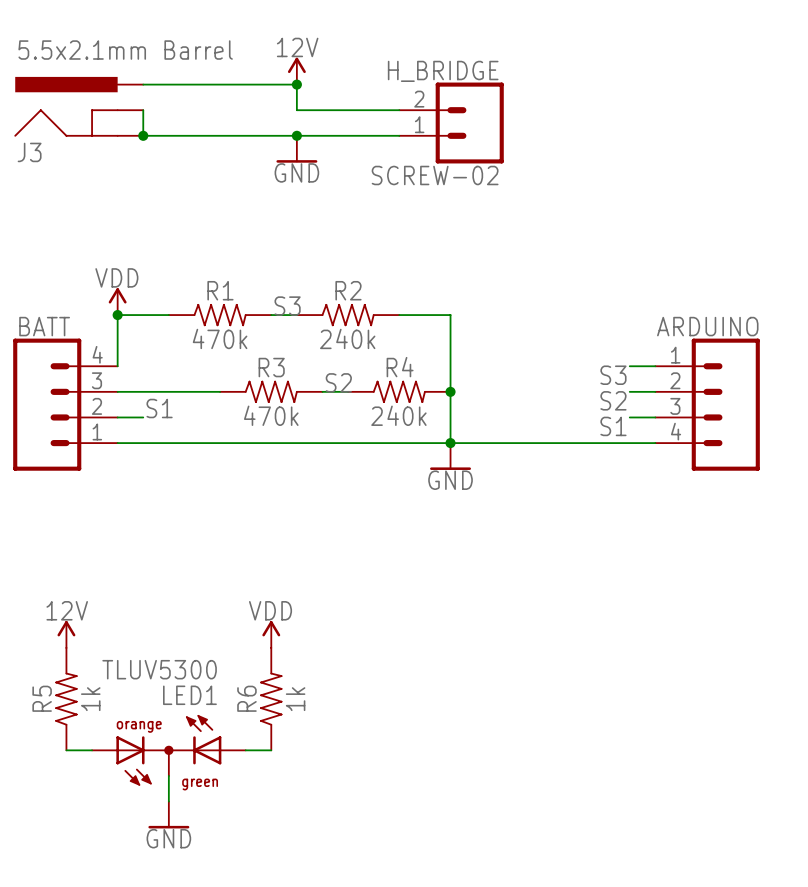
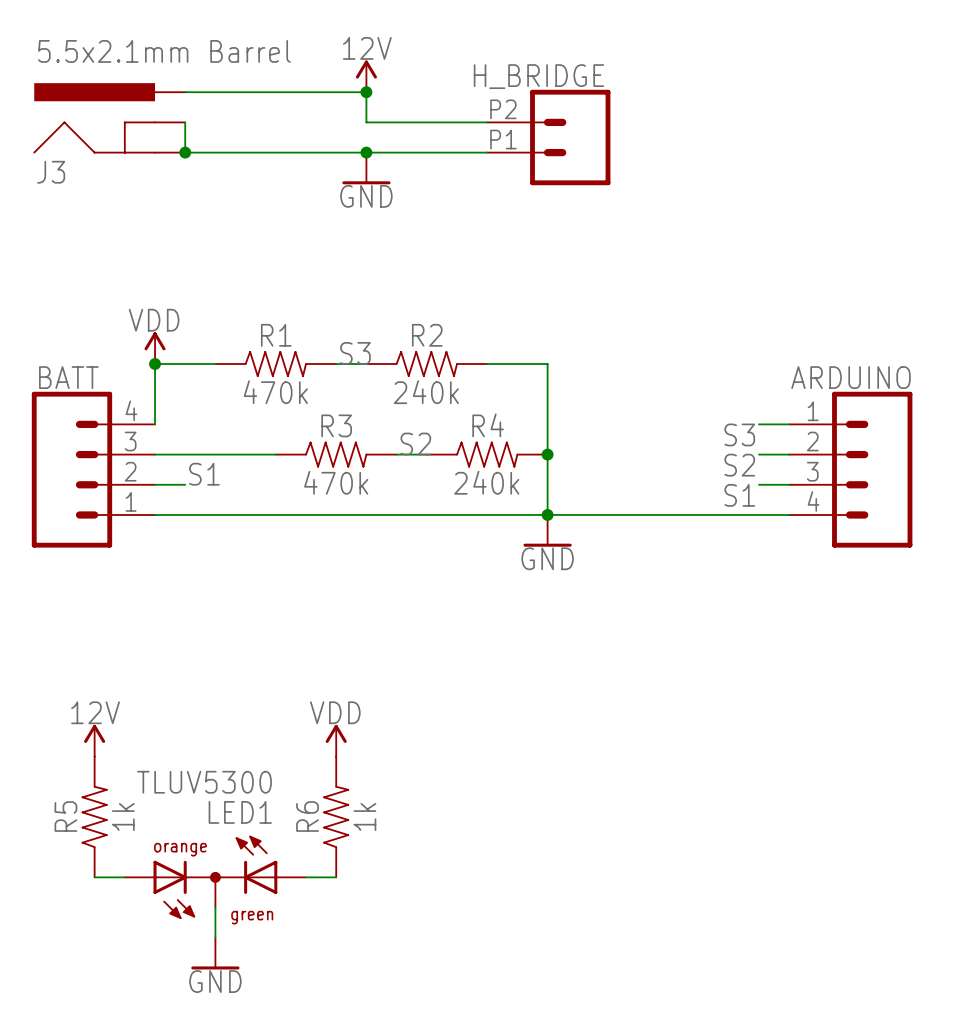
H_BRIDGE pin number: 2 (419, 99) -> P2 (503, 109)
H_BRIDGE pin number: 1 (419, 124) -> P1 (503, 139)
H_BRIDGE value: SCREW-02 (435, 175) -> none

